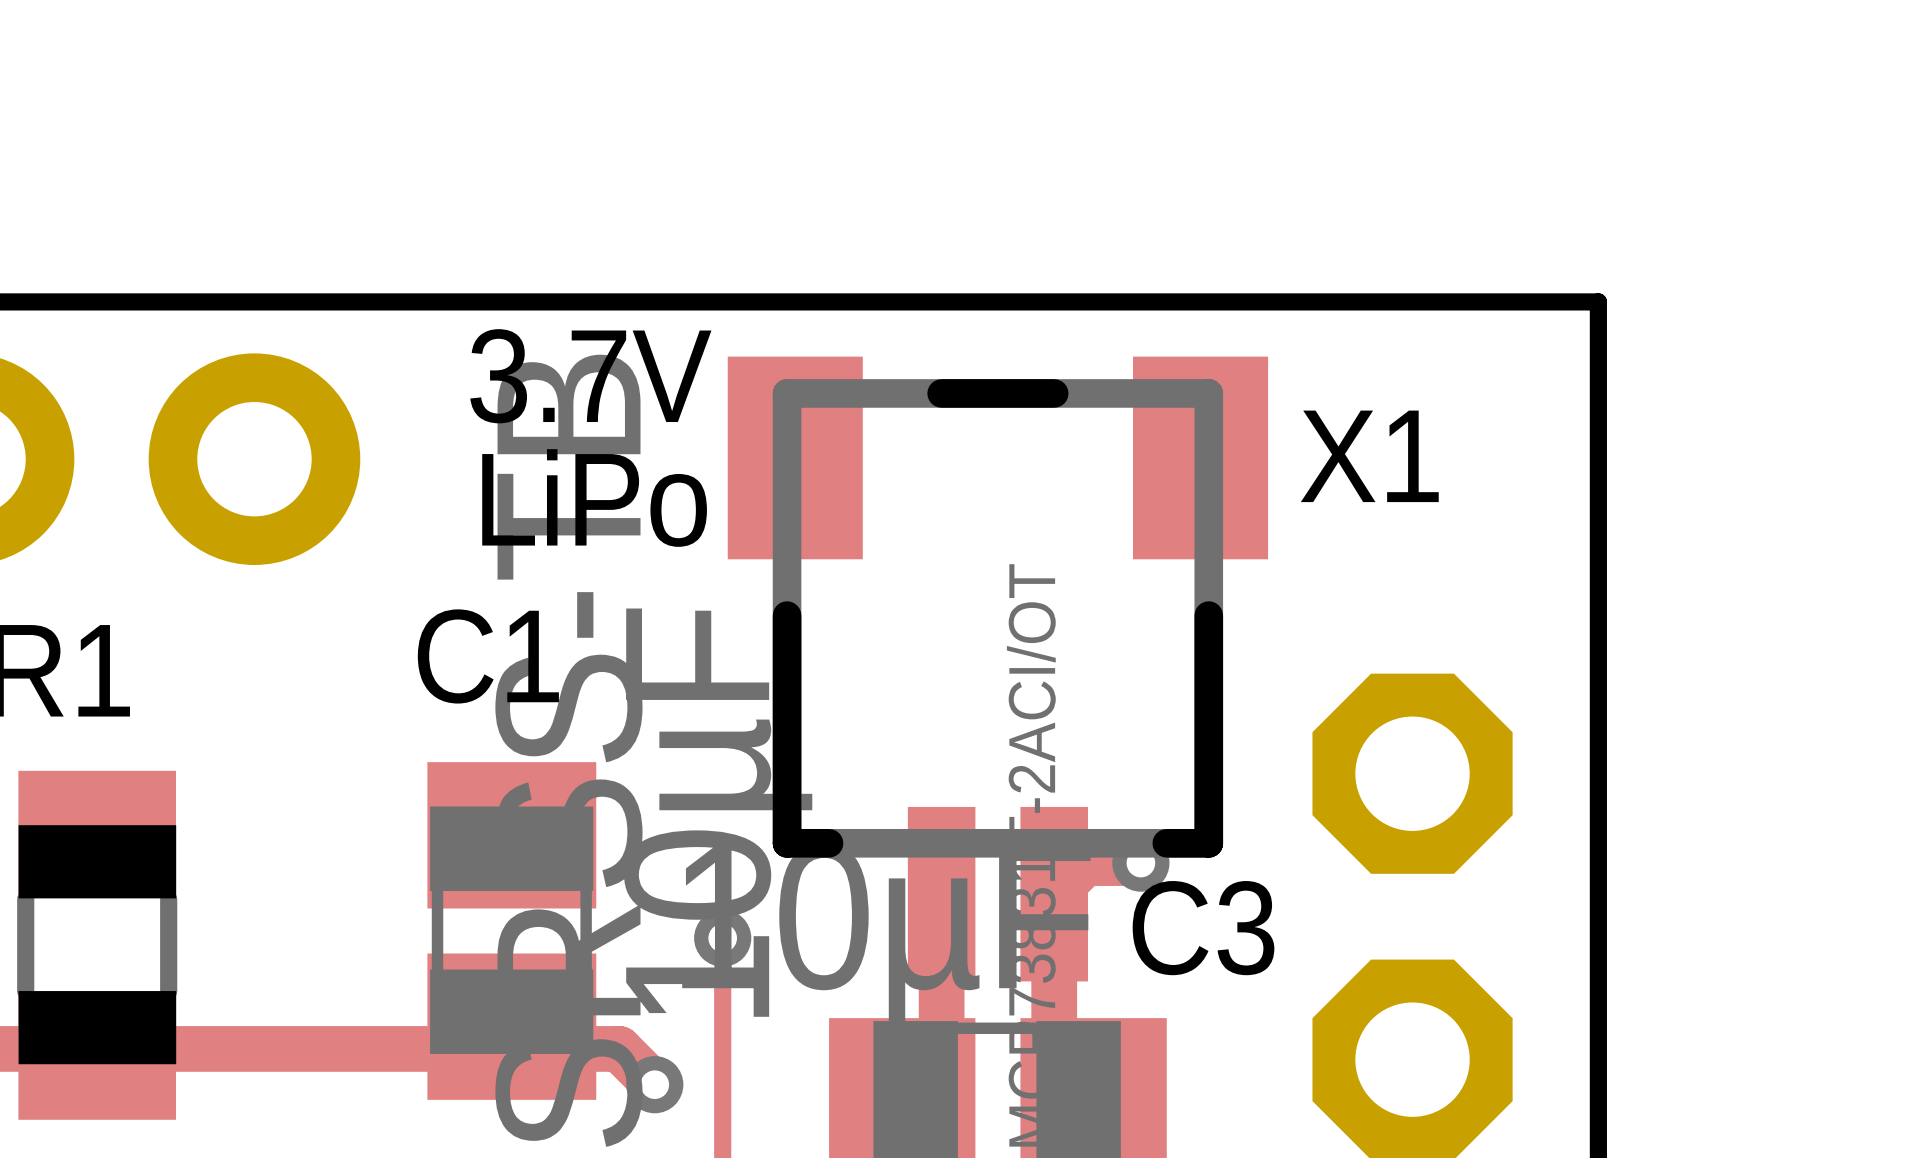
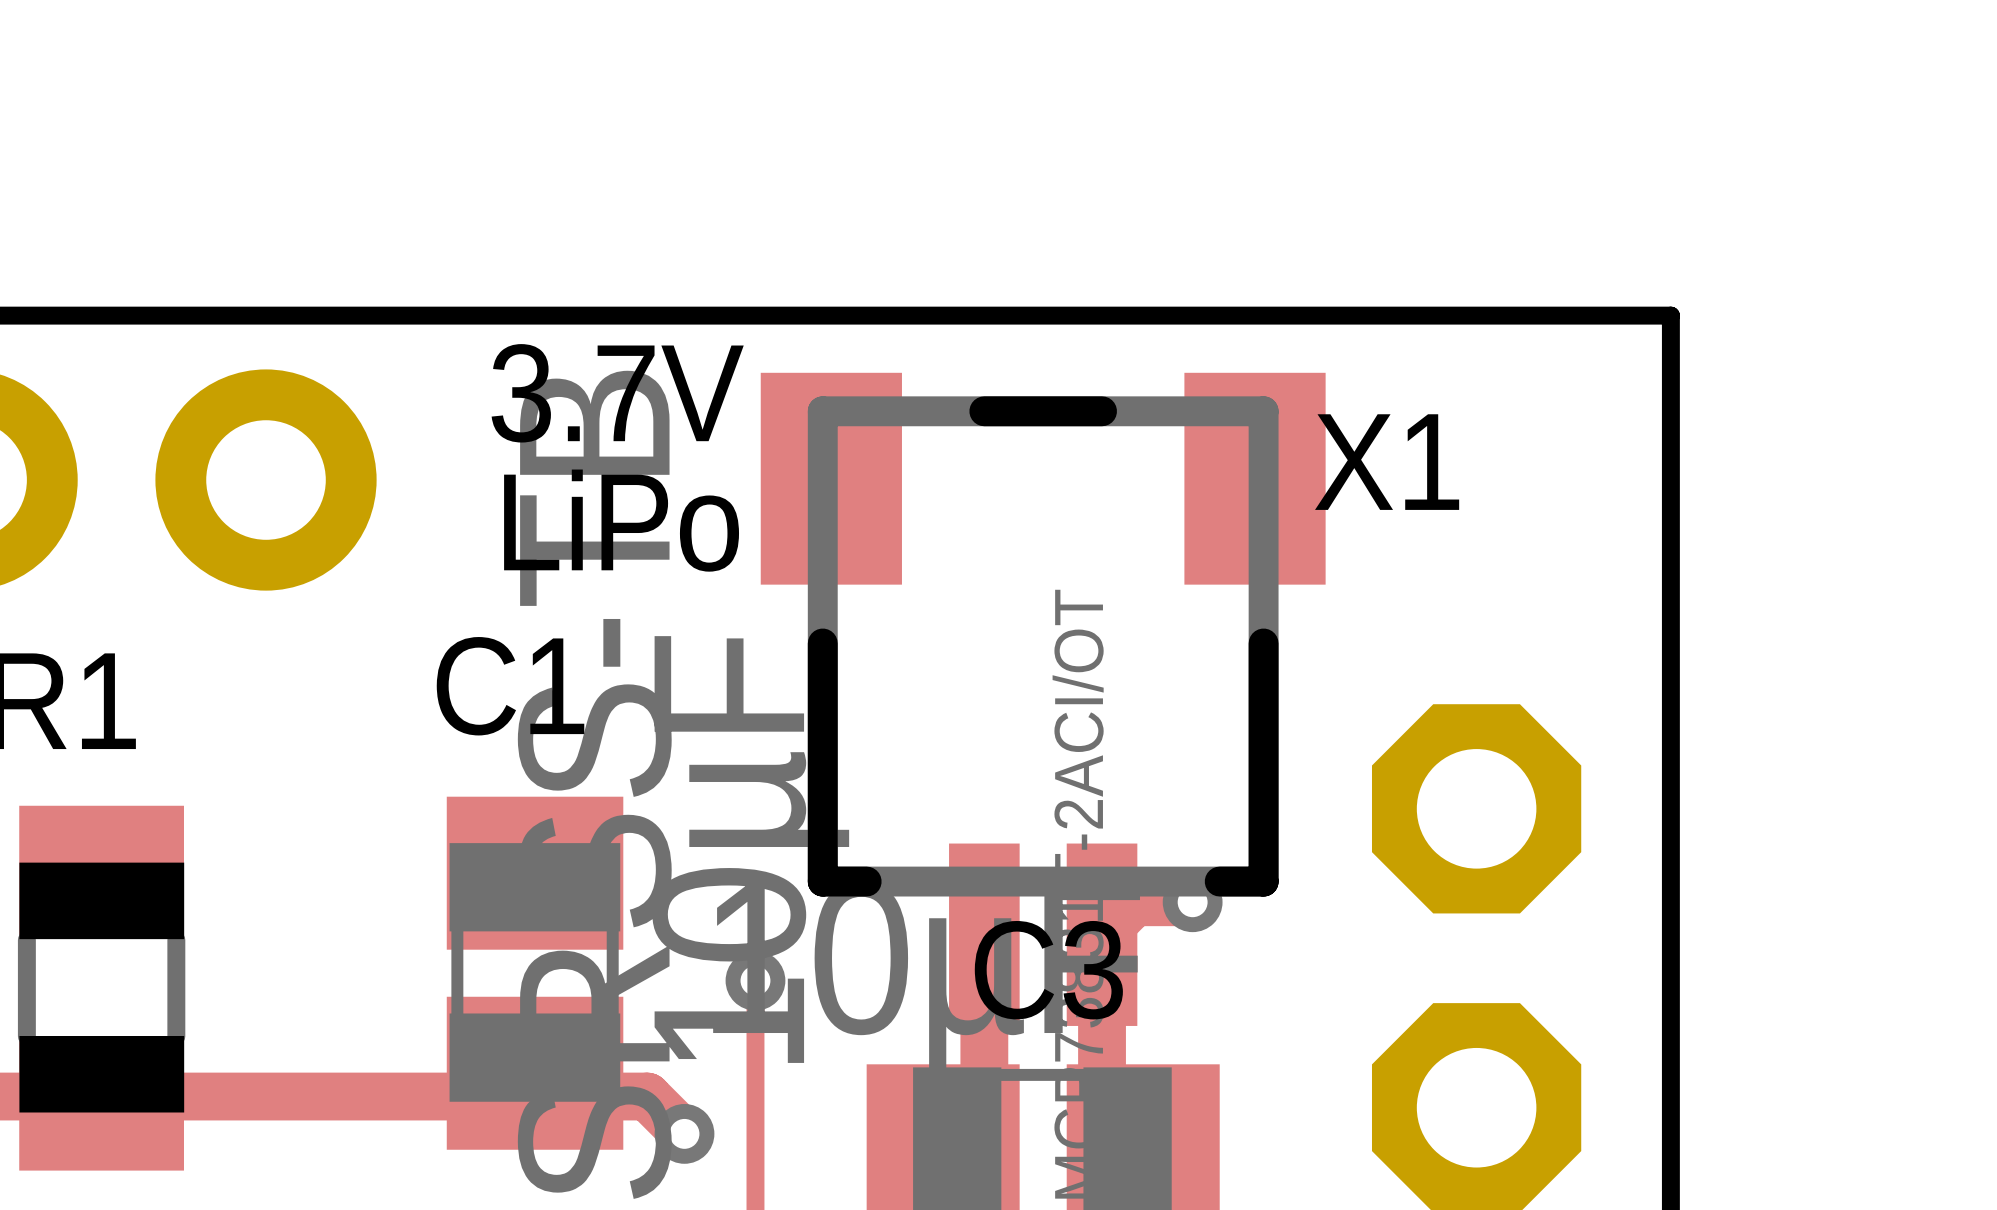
X1 name position: X1 (1369, 456) -> X1 (1387, 462)
C3 name position: C3 (1203, 928) -> C3 (1048, 970)

